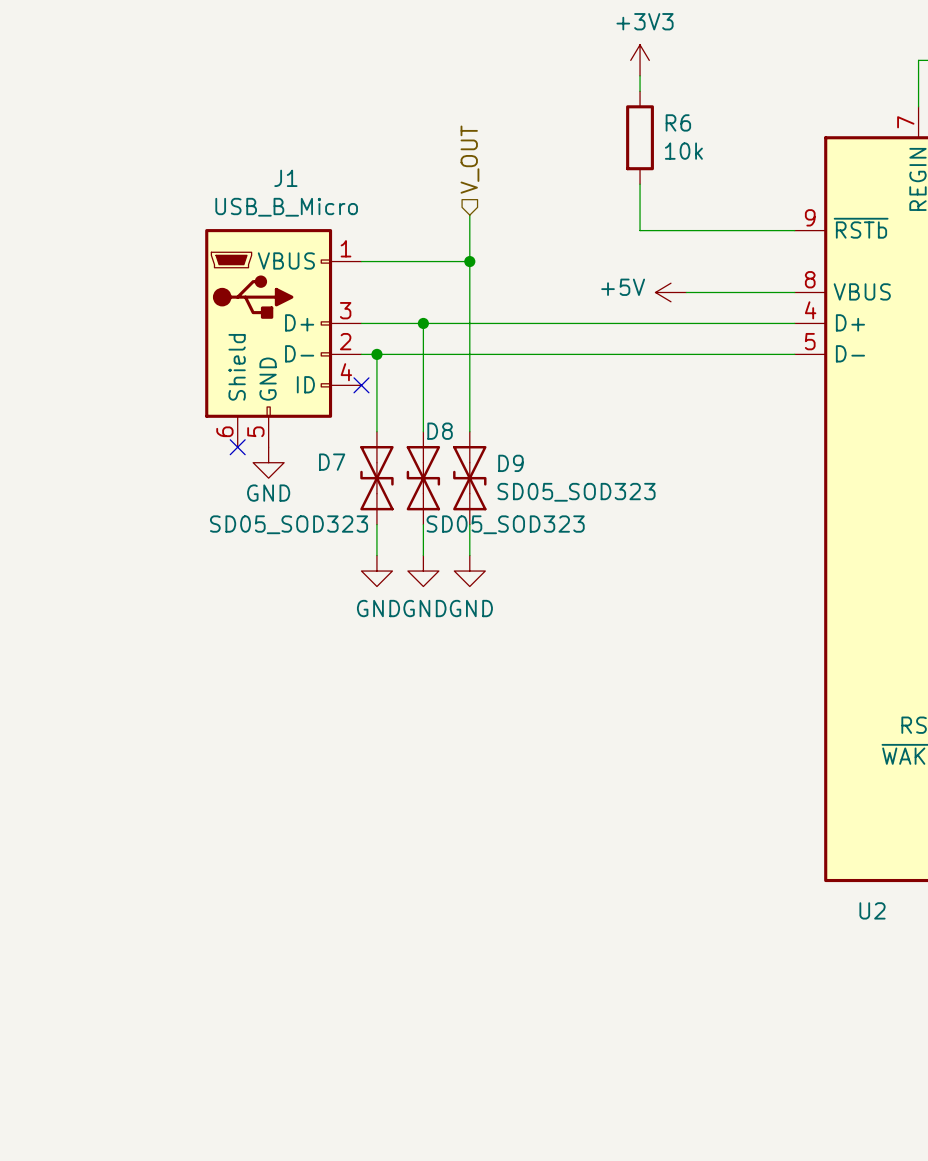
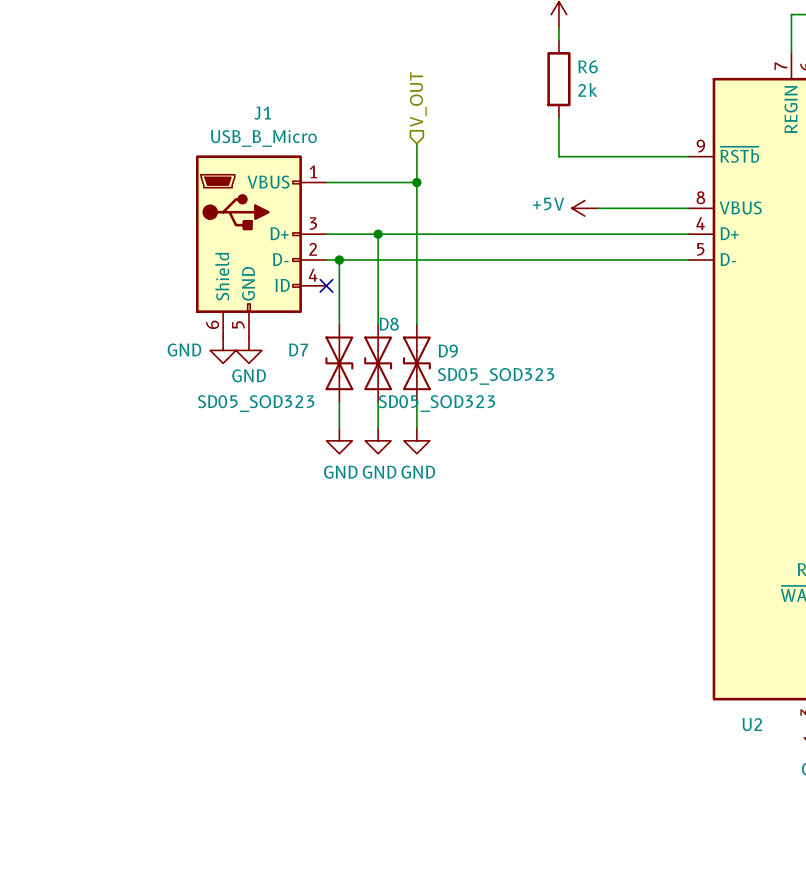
R6 value: 10k (683, 151) -> 2k (587, 89)
no-connect mark: (237, 447) -> none
power symbol: none -> GND (223, 350)

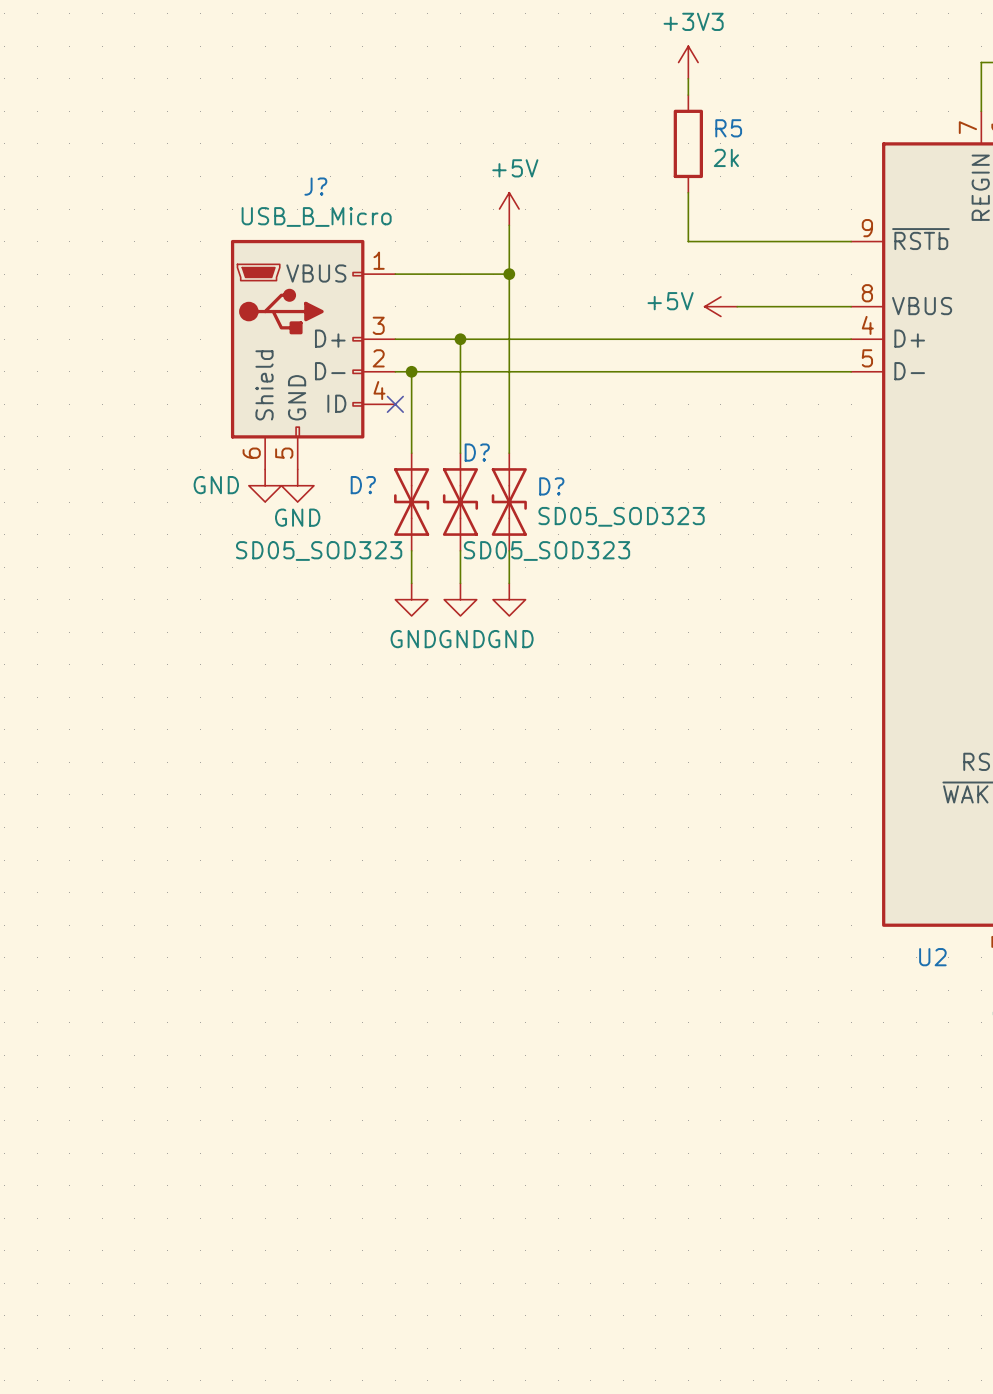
R6 name: R6 (588, 66) -> R5 (728, 128)
hierarchical label: V_OUT (418, 99) -> none
J1 name: J1 (262, 113) -> J? (315, 186)
power symbol: none -> +5V (509, 209)
D8 name: D8 (389, 324) -> D? (477, 452)
D7 name: D7 (298, 349) -> D? (363, 485)
D9 name: D9 (448, 351) -> D? (551, 486)

